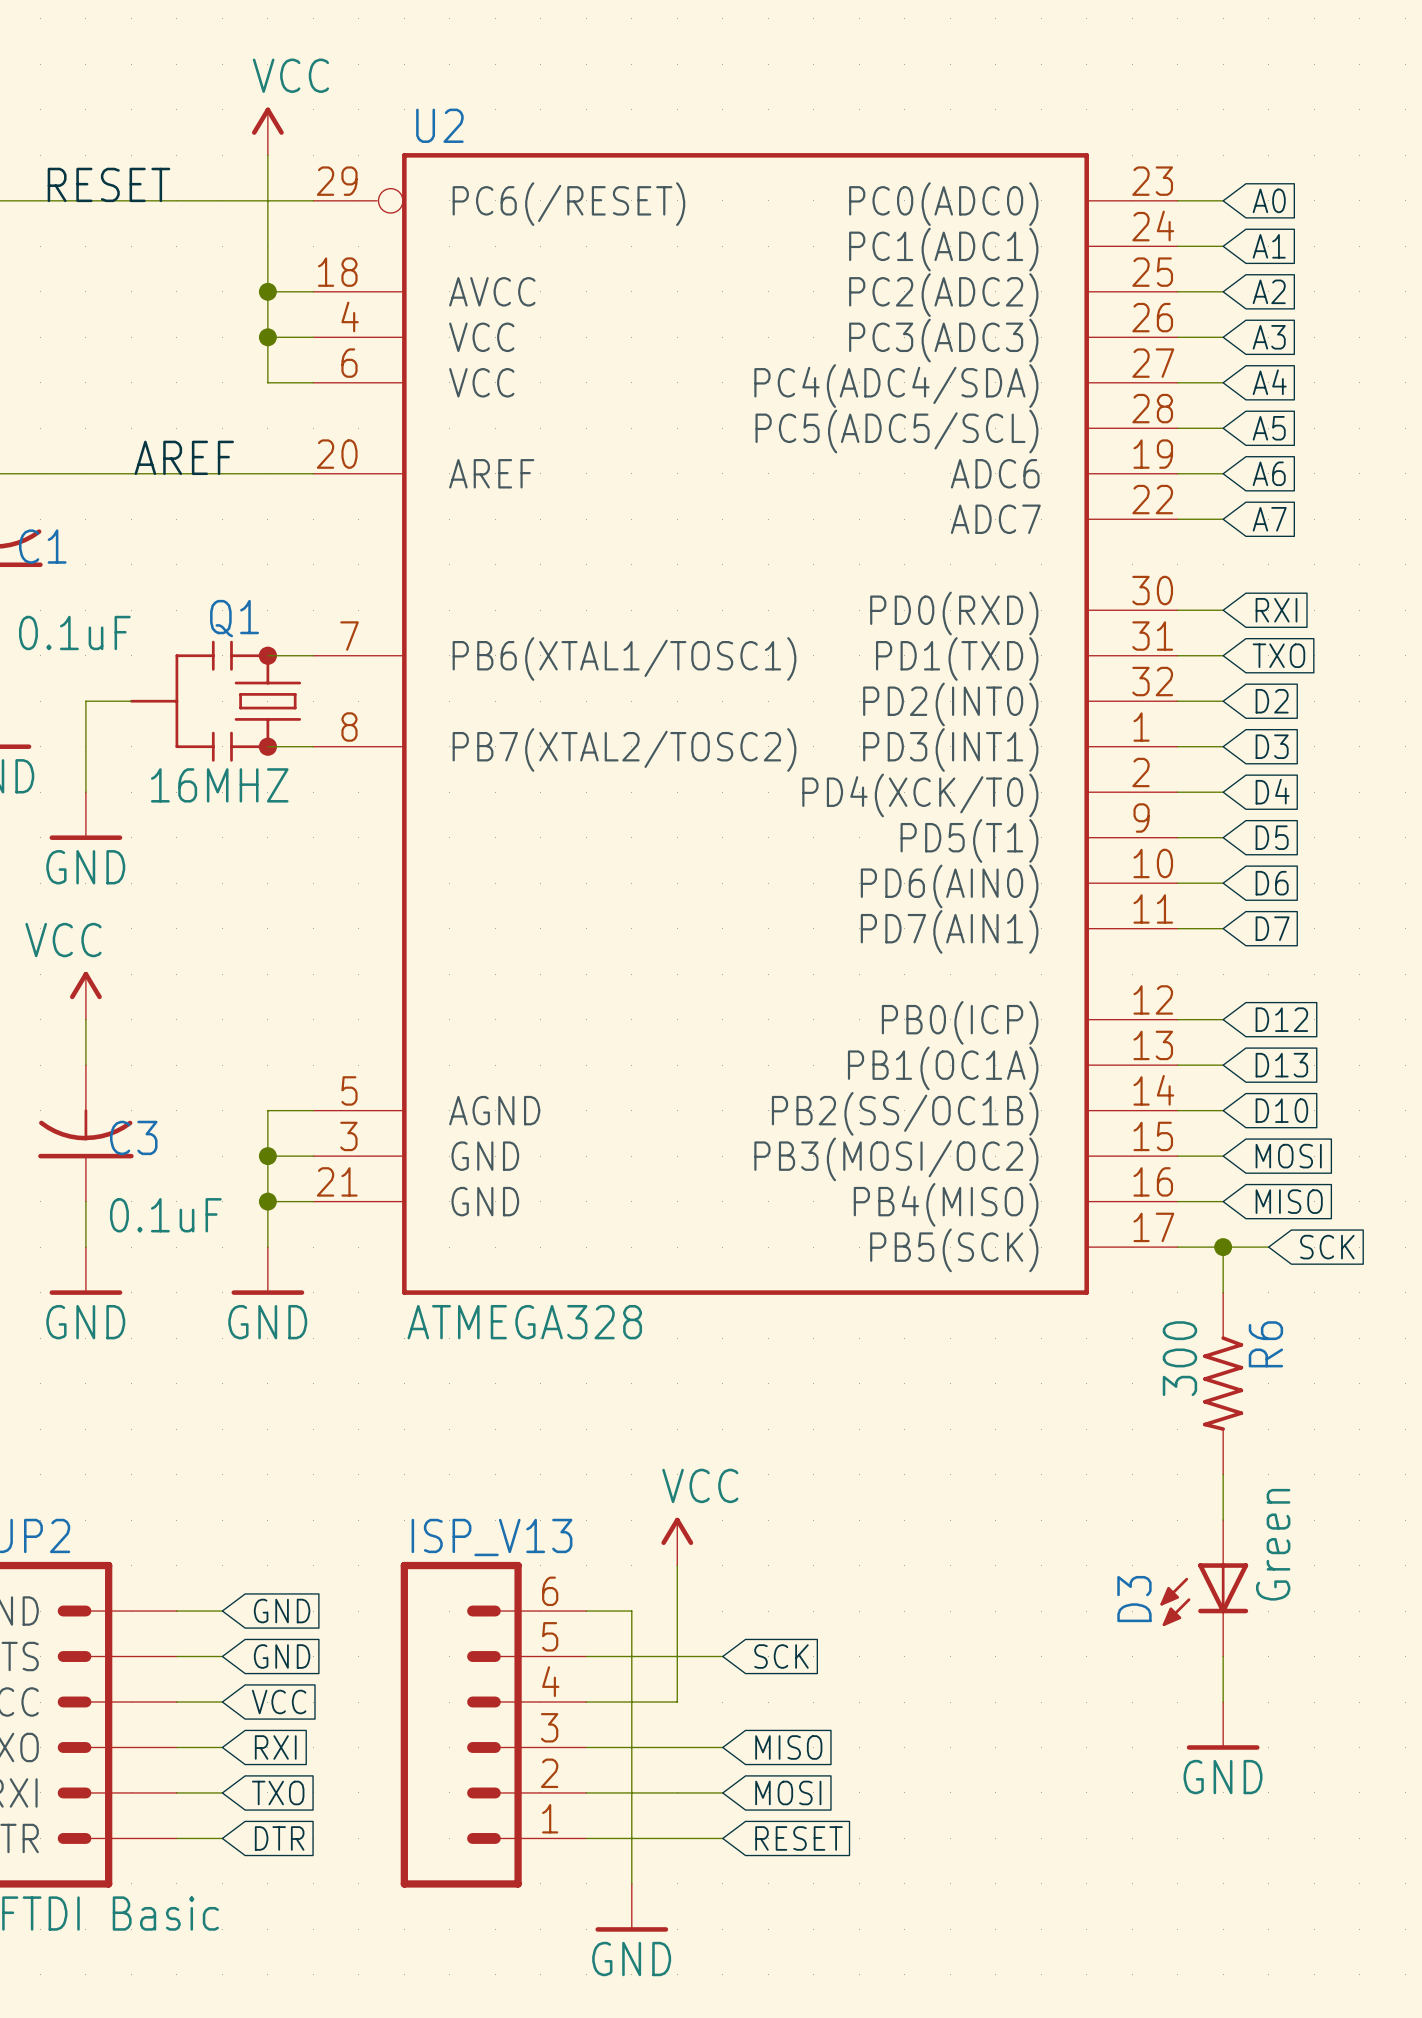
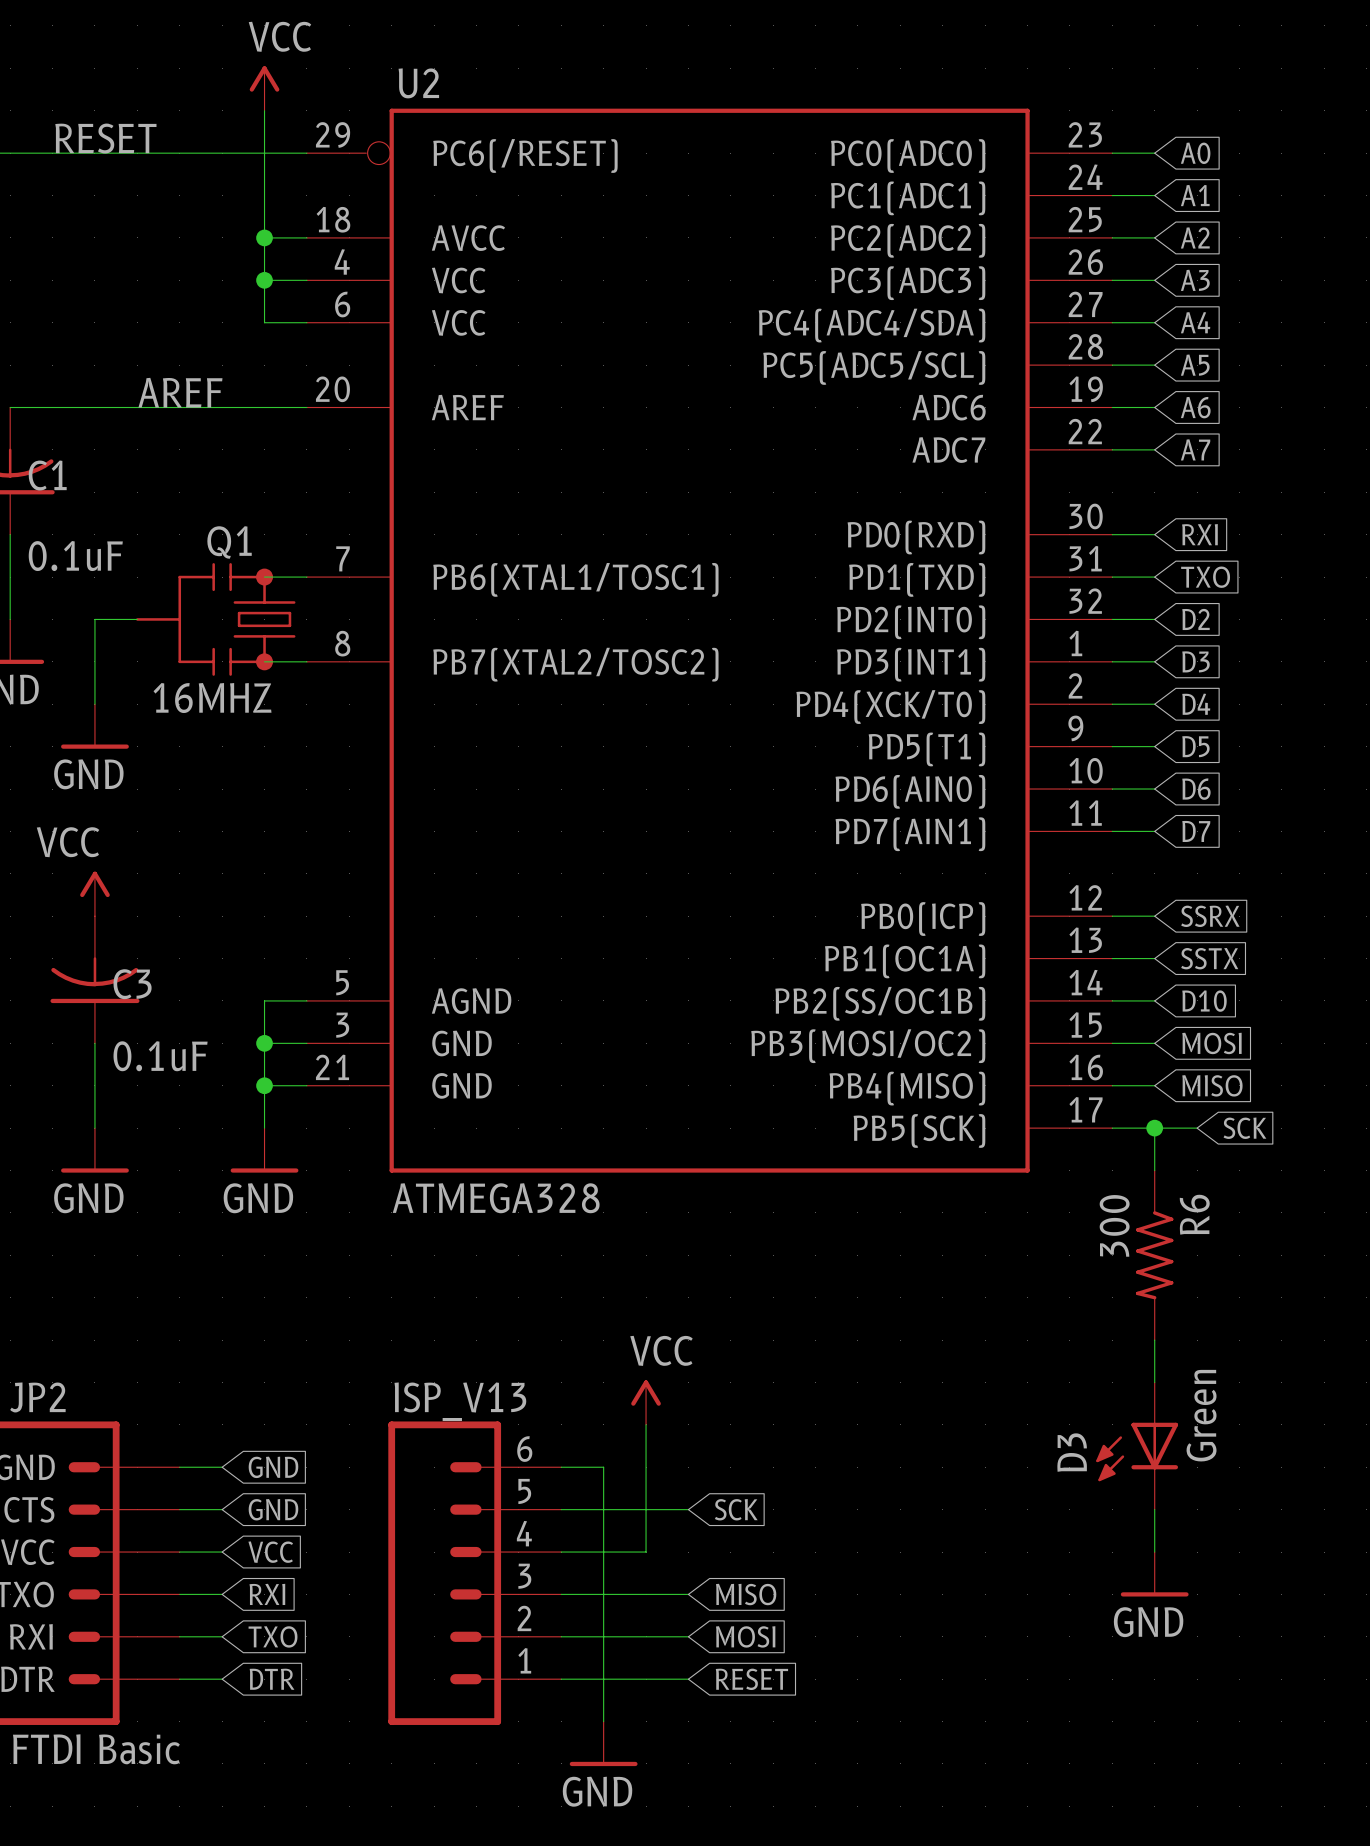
global label: D12 (1281, 1019) -> SSRX (1210, 916)
global label: D13 (1281, 1065) -> SSTX (1209, 958)
C3 position: (85, 1133) -> (94, 979)

